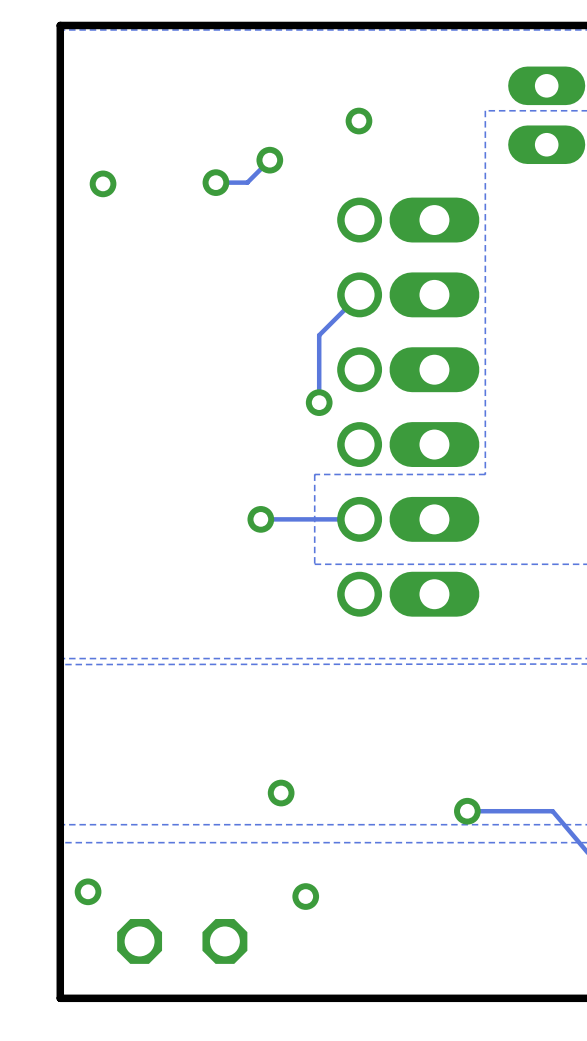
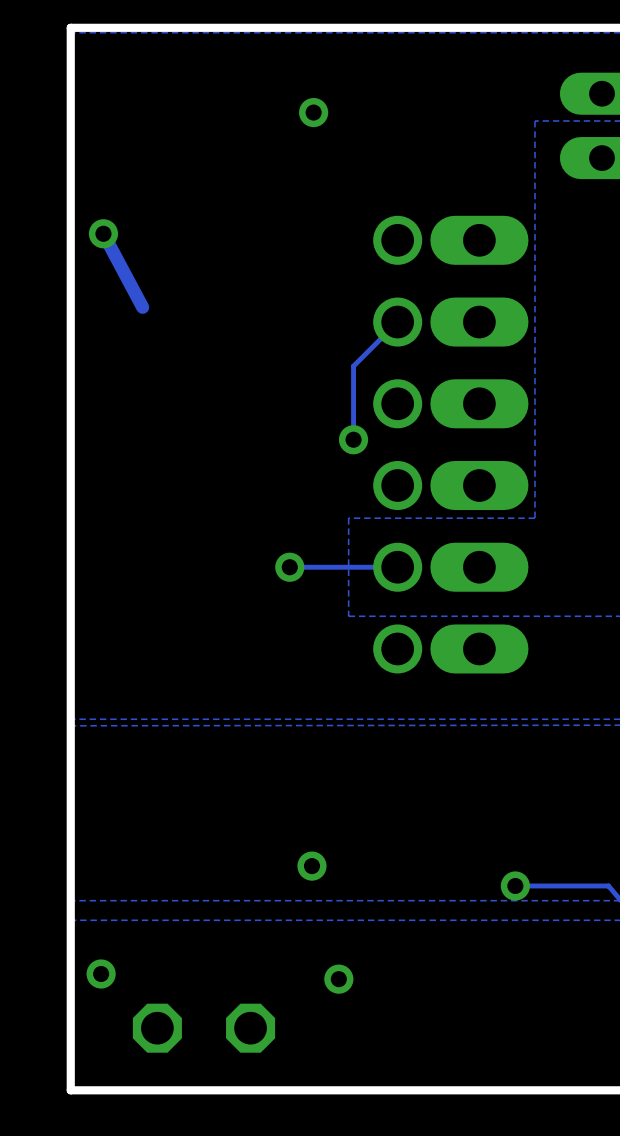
via: none -> (313, 112)
via: (358, 121) -> none
track: (269, 160) (247, 182) (215, 182) -> none
via: (269, 160) -> none
via: (215, 182) -> none
via position: (103, 183) -> (103, 233)
track: none -> (103, 233) (142, 307)

